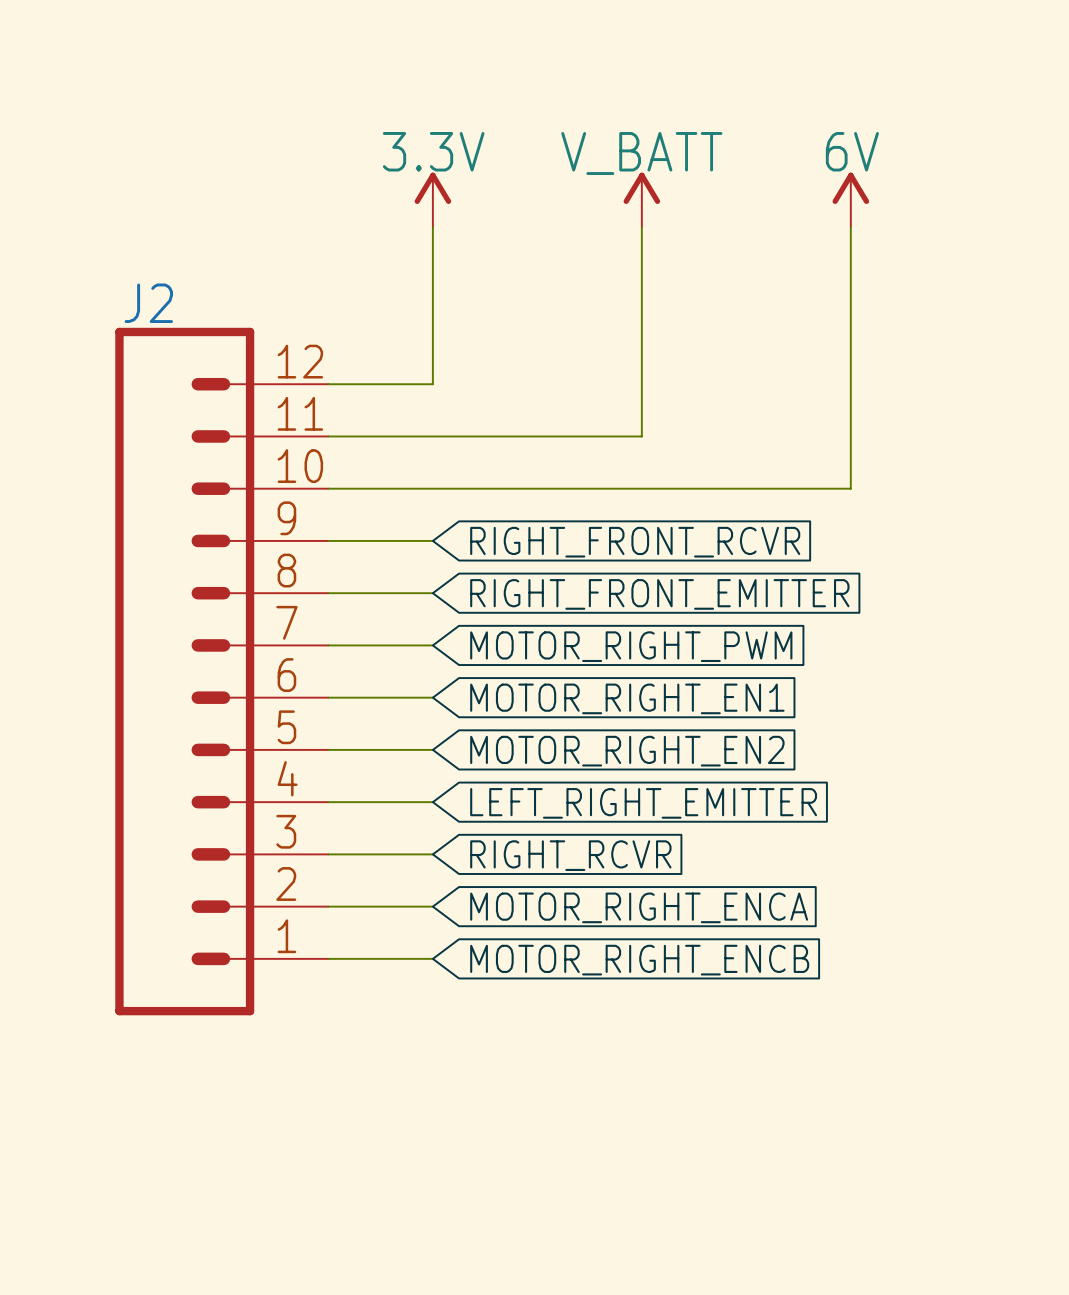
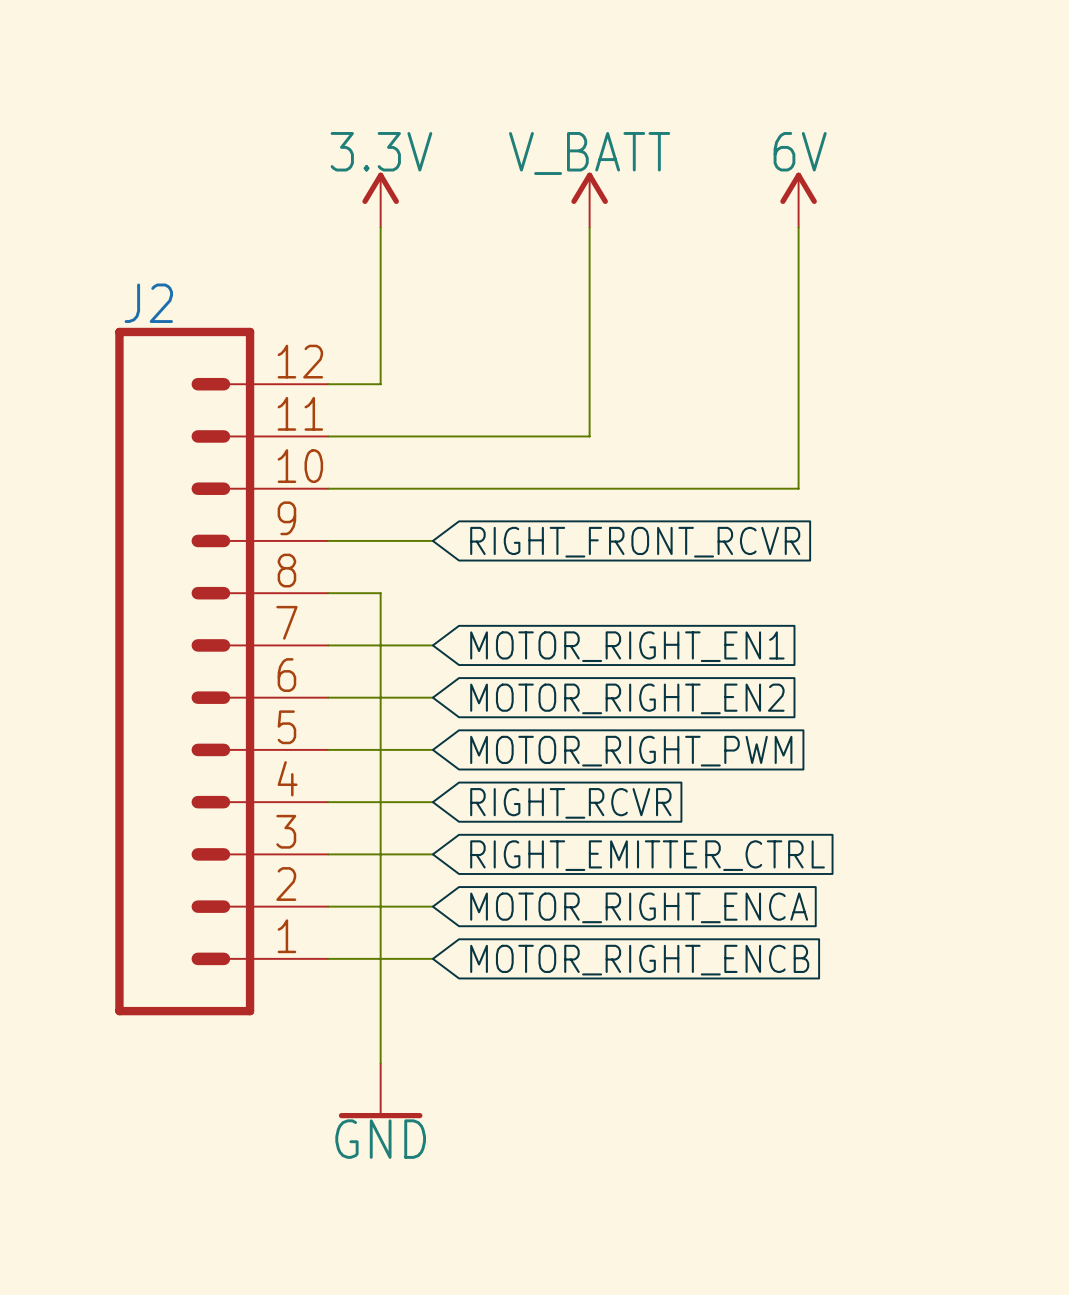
power symbol position: 3.3V (432, 200) -> 3.3V (380, 200)
power symbol position: V_BATT (641, 200) -> V_BATT (589, 200)
power symbol position: 6V (850, 200) -> 6V (798, 200)
wire: (432, 227) (432, 384) (380, 384) -> (380, 227) (380, 384)
wire: (641, 227) (641, 436) (589, 436) -> (589, 227) (589, 436)
wire: (850, 227) (850, 488) (798, 488) -> (798, 227) (798, 488)
wire: (380, 593) (432, 593) -> (380, 593) (380, 1063)
global label: RIGHT_FRONT_EMITTER (659, 594) -> none
global label: MOTOR_RIGHT_PWM (631, 646) -> MOTOR_RIGHT_EN1 (627, 646)
global label: MOTOR_RIGHT_EN1 (627, 698) -> MOTOR_RIGHT_EN2 (627, 698)
global label: MOTOR_RIGHT_EN2 (627, 751) -> MOTOR_RIGHT_PWM (631, 751)
global label: LEFT_RIGHT_EMITTER (643, 803) -> RIGHT_RCVR (570, 803)
global label: RIGHT_RCVR (570, 855) -> RIGHT_EMITTER_CTRL (647, 855)
power symbol: none -> GND (380, 1090)

